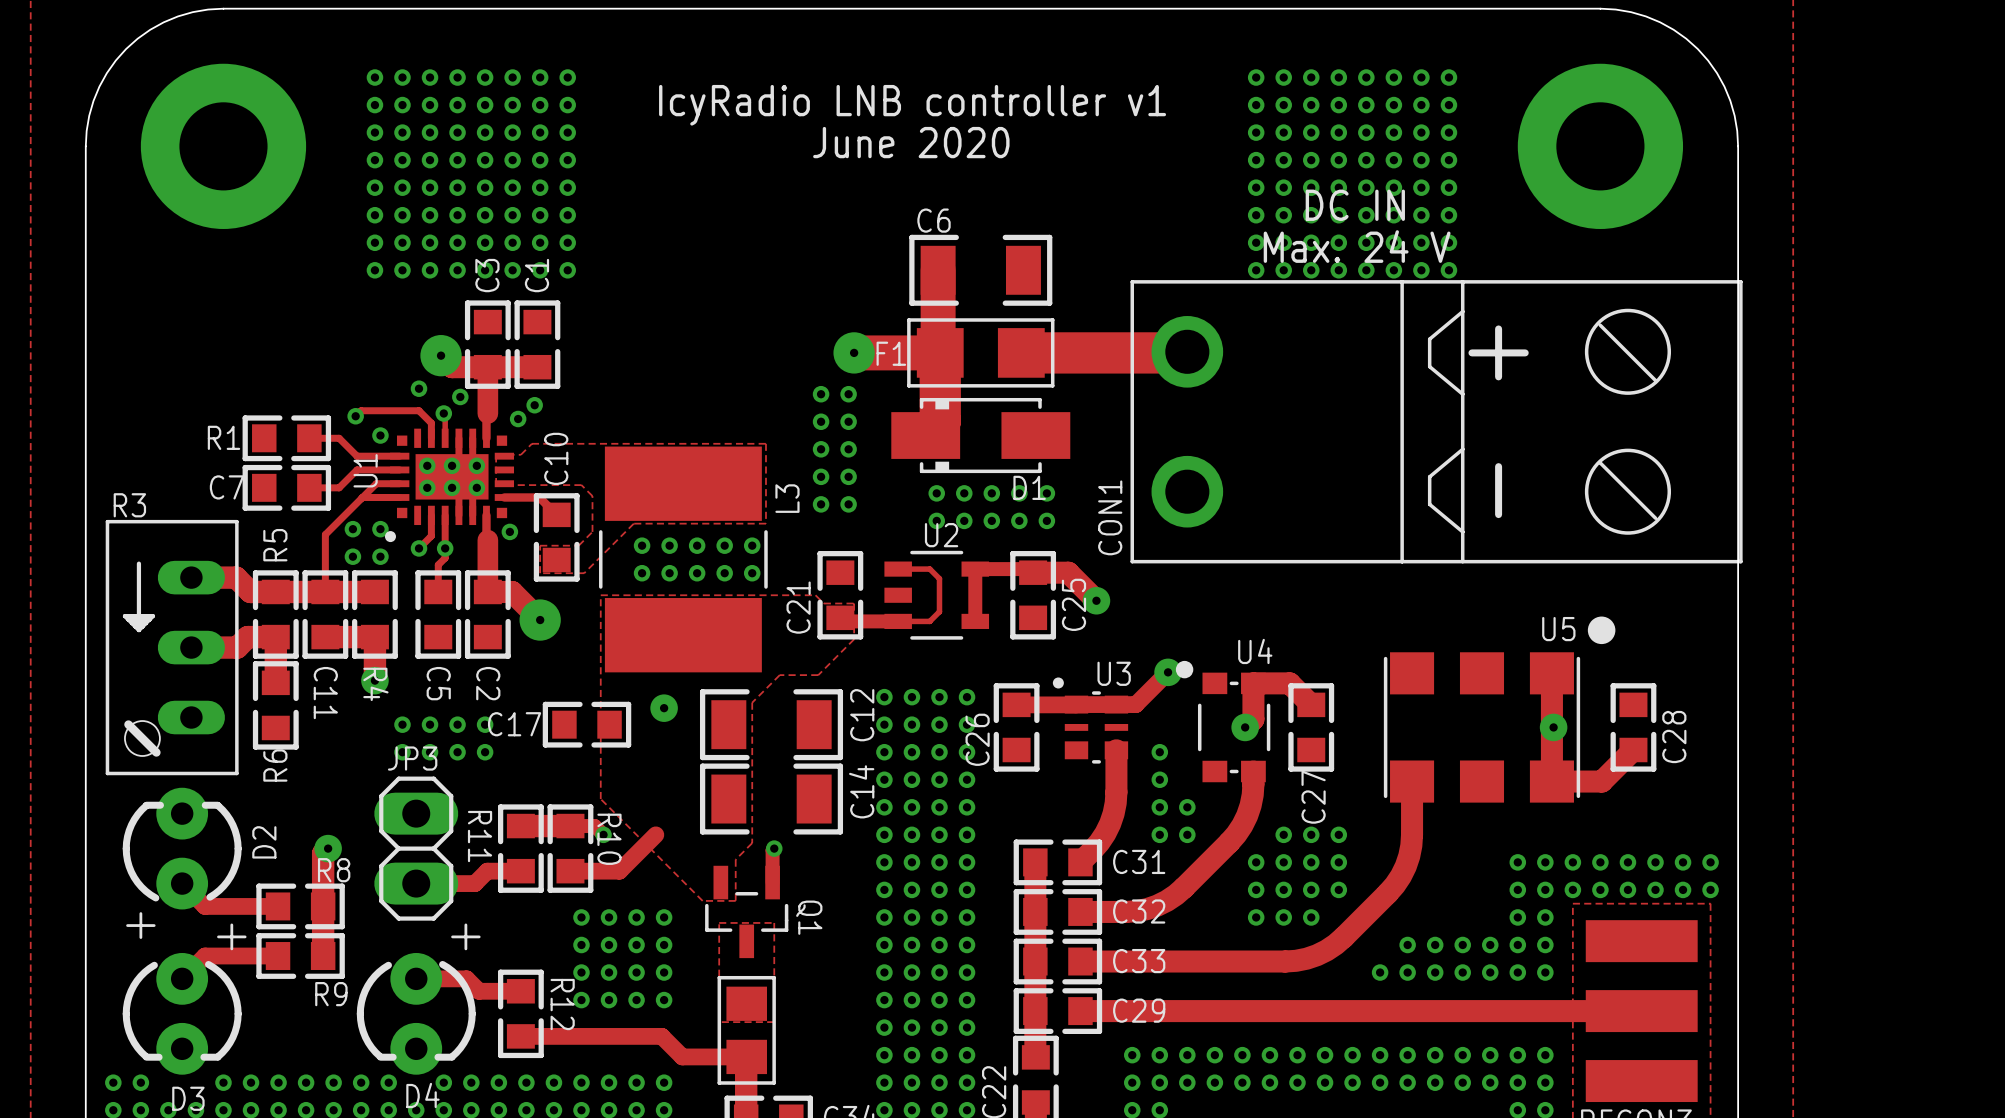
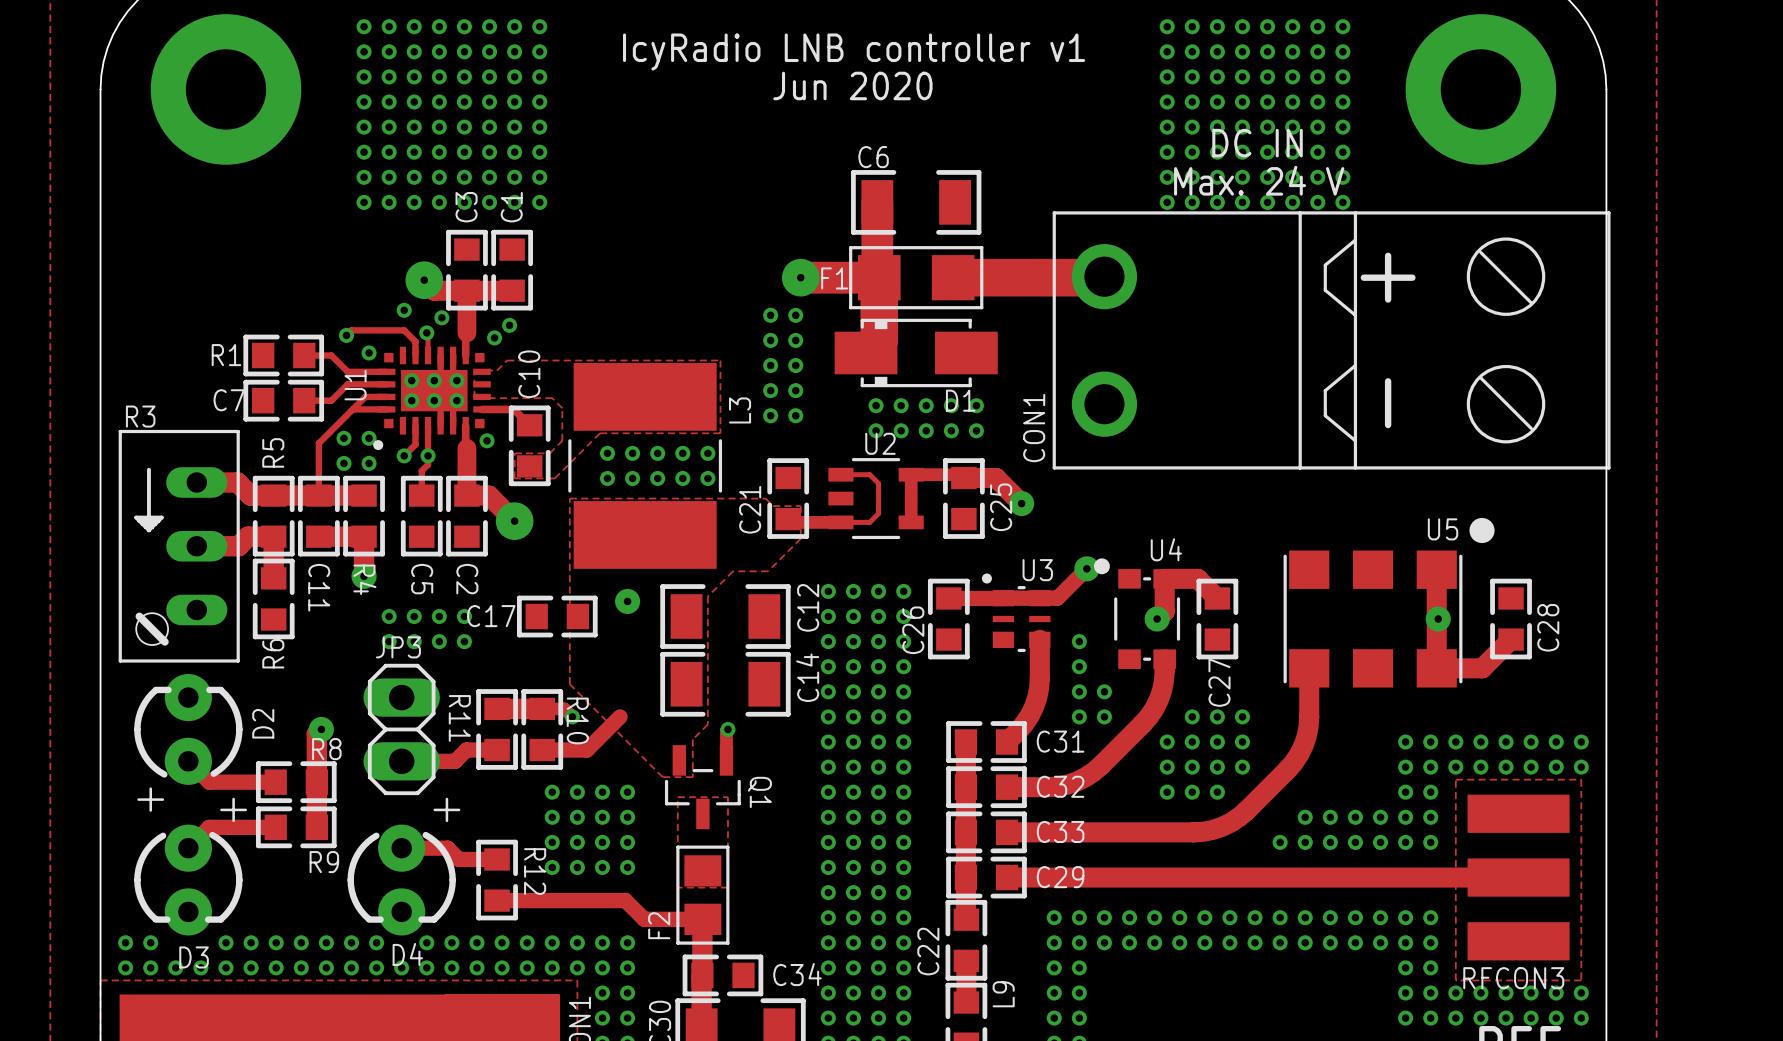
text: June 2020 (911, 142) -> Jun 2020 (852, 85)
F2 name: none -> F2 (659, 925)

